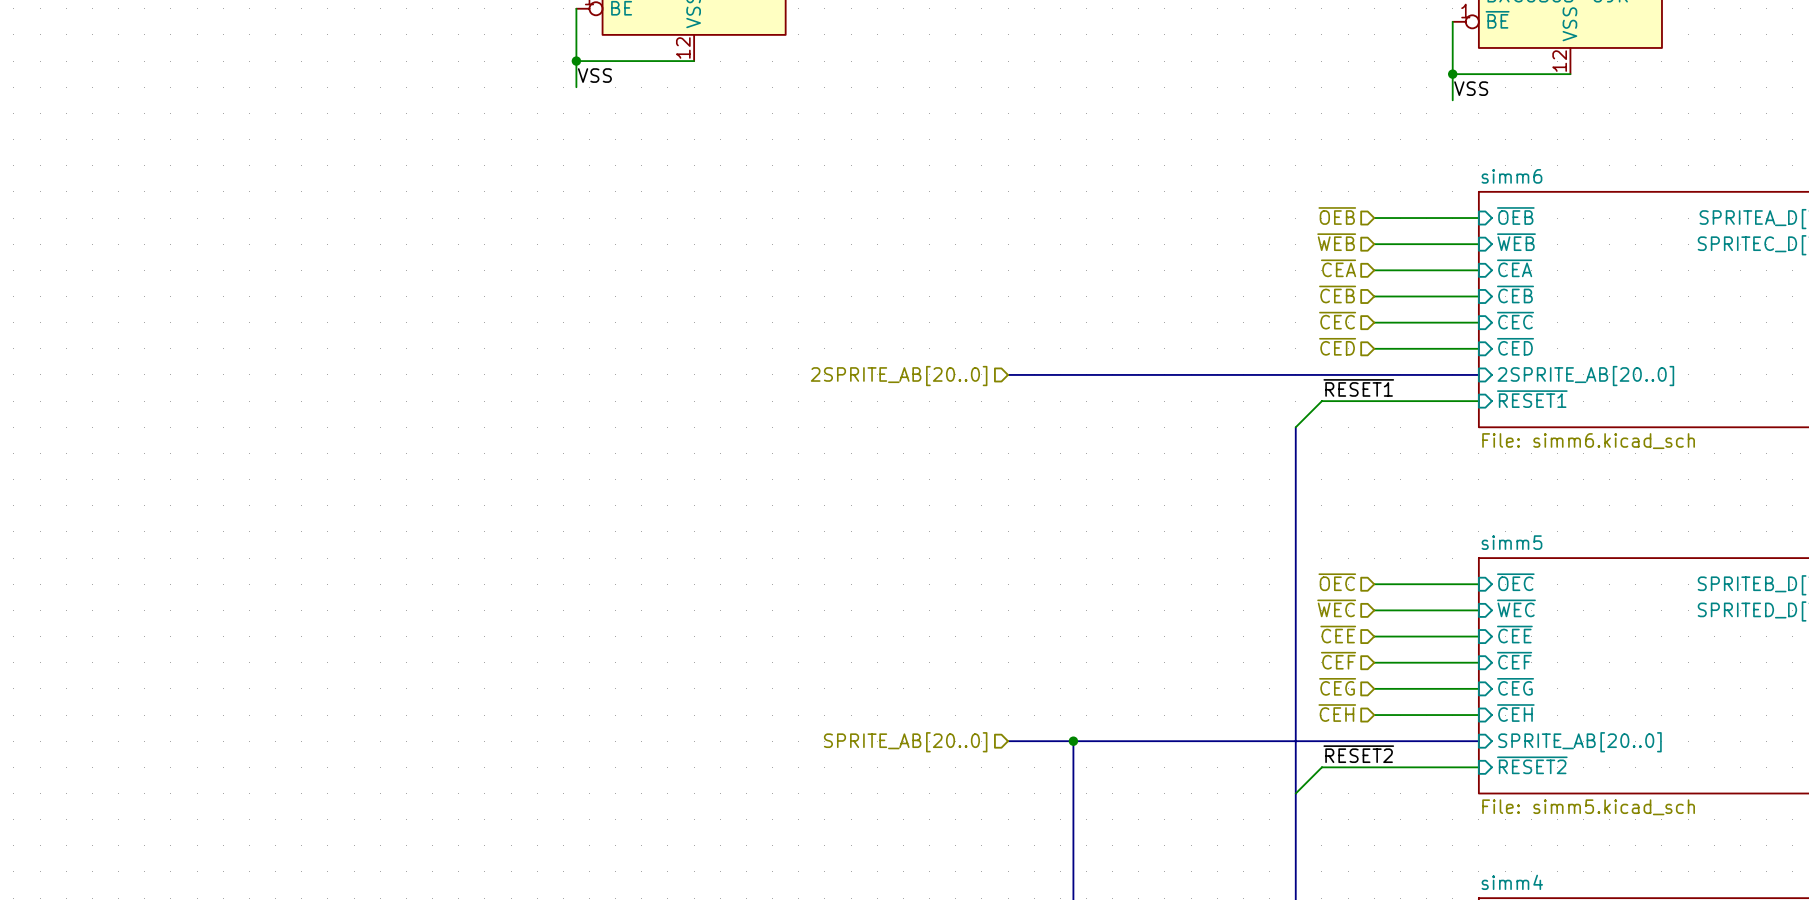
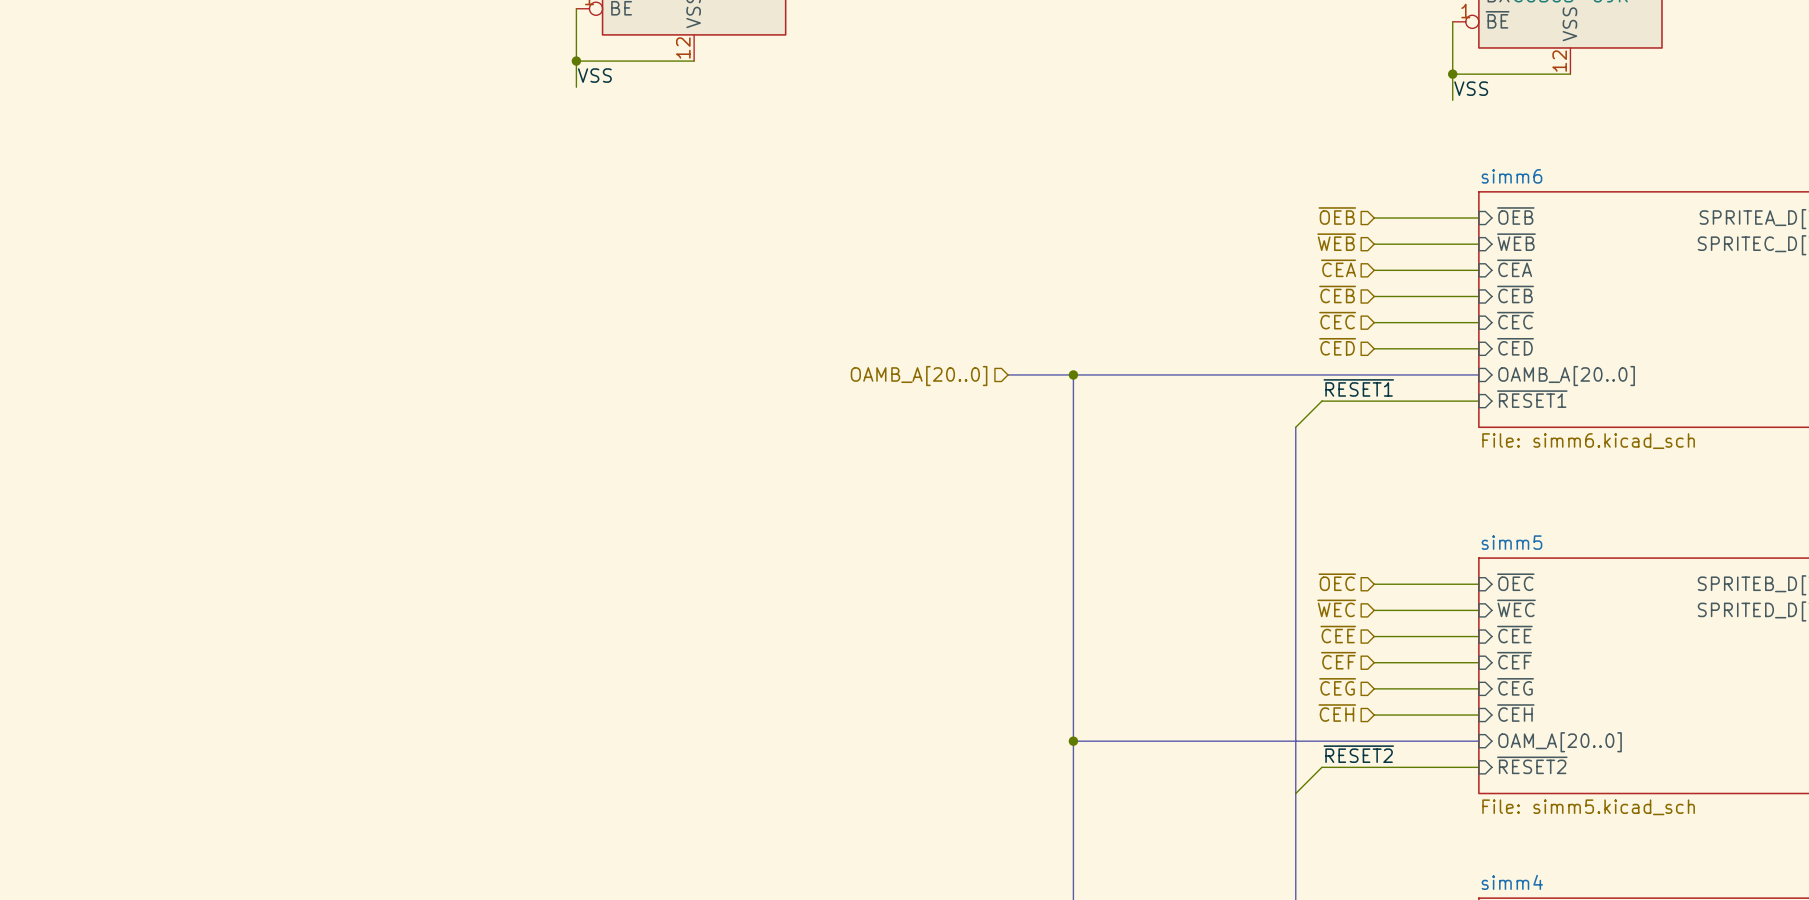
junction: none -> (1073, 374)
hierarchical label: 2SPRITE_AB[20..0] (899, 376) -> OAMB_A[20..0] (919, 376)
sheet pin: 2SPRITE_AB[20..0] (1585, 376) -> OAMB_A[20..0] (1566, 376)
bus: (1008, 741) (1073, 741) -> (1073, 374) (1073, 741)
hierarchical label: SPRITE_AB[20..0] (905, 742) -> none
sheet pin: SPRITE_AB[20..0] (1579, 742) -> OAM_A[20..0] (1560, 742)

